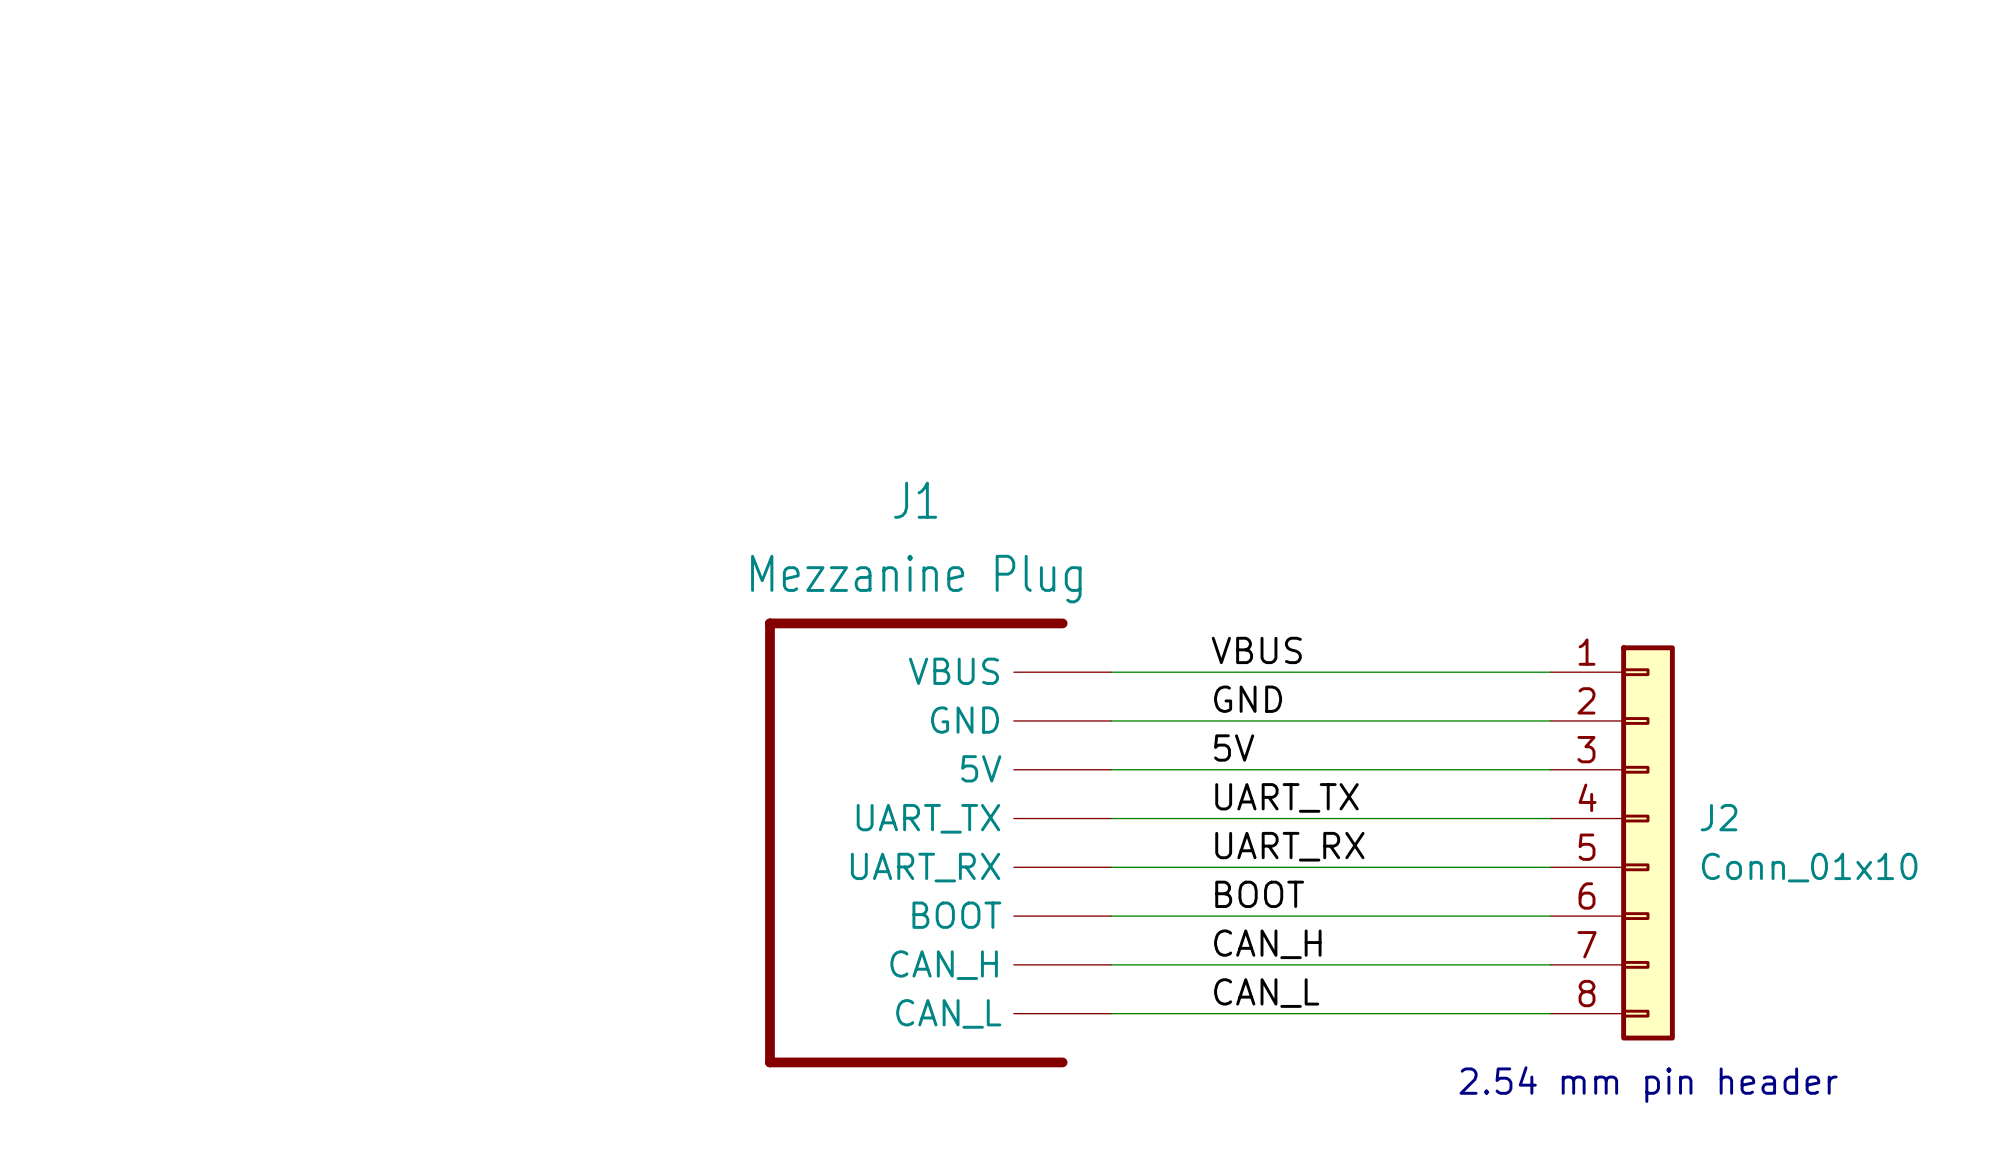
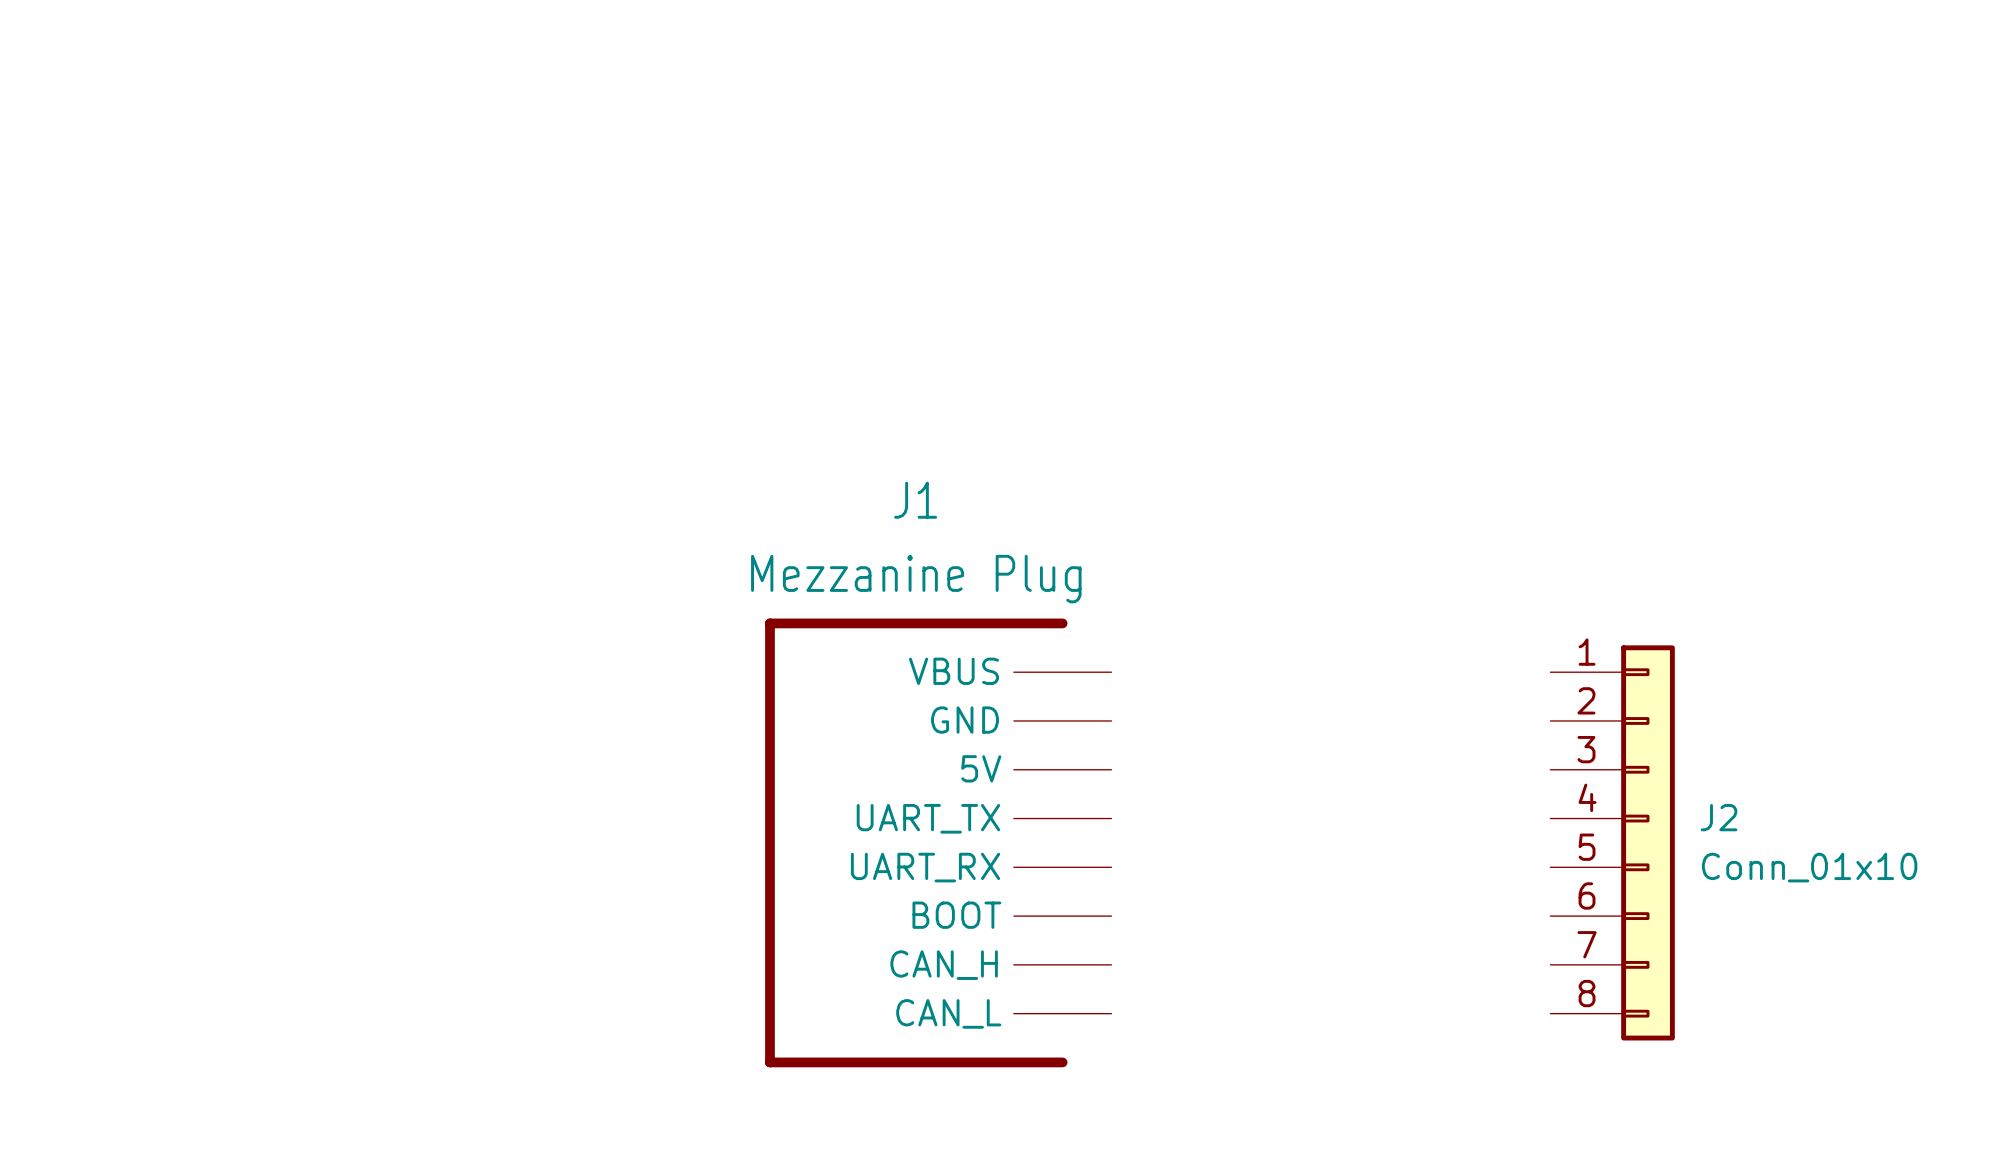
label: VBUS (1256, 650) -> none
wire: (1111, 672) (1550, 672) -> none
label: GND (1248, 699) -> none
wire: (1111, 720) (1550, 720) -> none
label: 5V (1234, 747) -> none
wire: (1111, 769) (1550, 769) -> none
label: UART_TX (1286, 797) -> none
wire: (1111, 818) (1550, 818) -> none
label: UART_RX (1289, 846) -> none
wire: (1111, 867) (1550, 867) -> none
label: BOOT (1259, 894) -> none
wire: (1111, 916) (1550, 916) -> none
label: CAN_H (1267, 944) -> none
wire: (1111, 964) (1550, 964) -> none
label: CAN_L (1266, 993) -> none
wire: (1111, 1013) (1550, 1013) -> none
text: 2.54 mm pin header (1648, 1084) -> none

